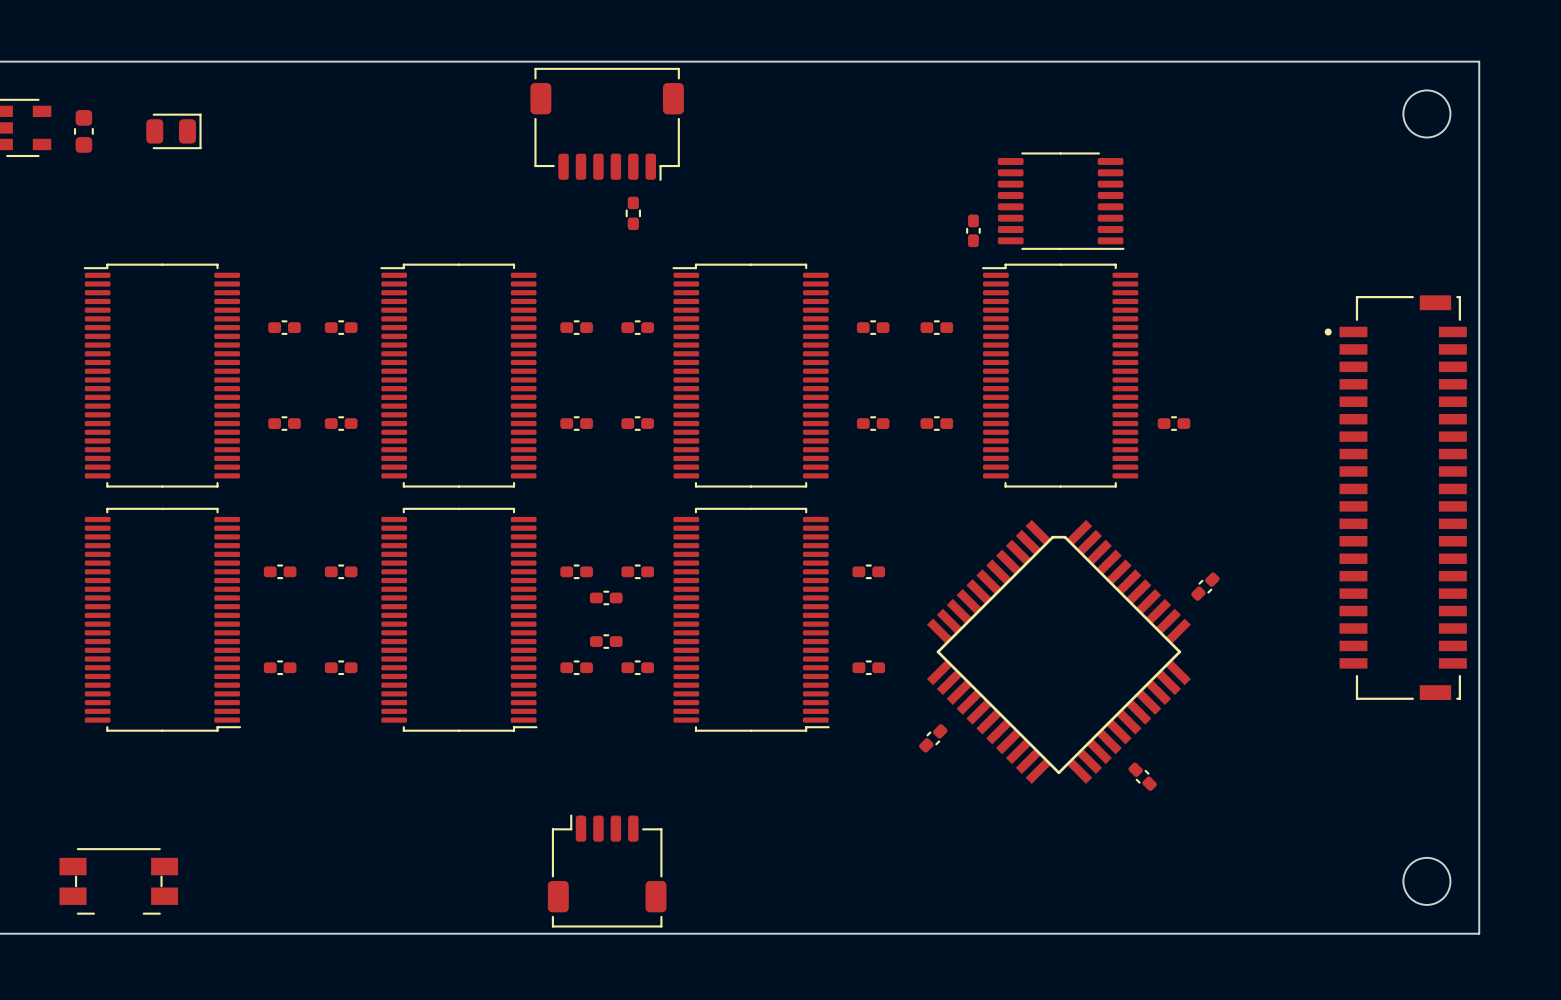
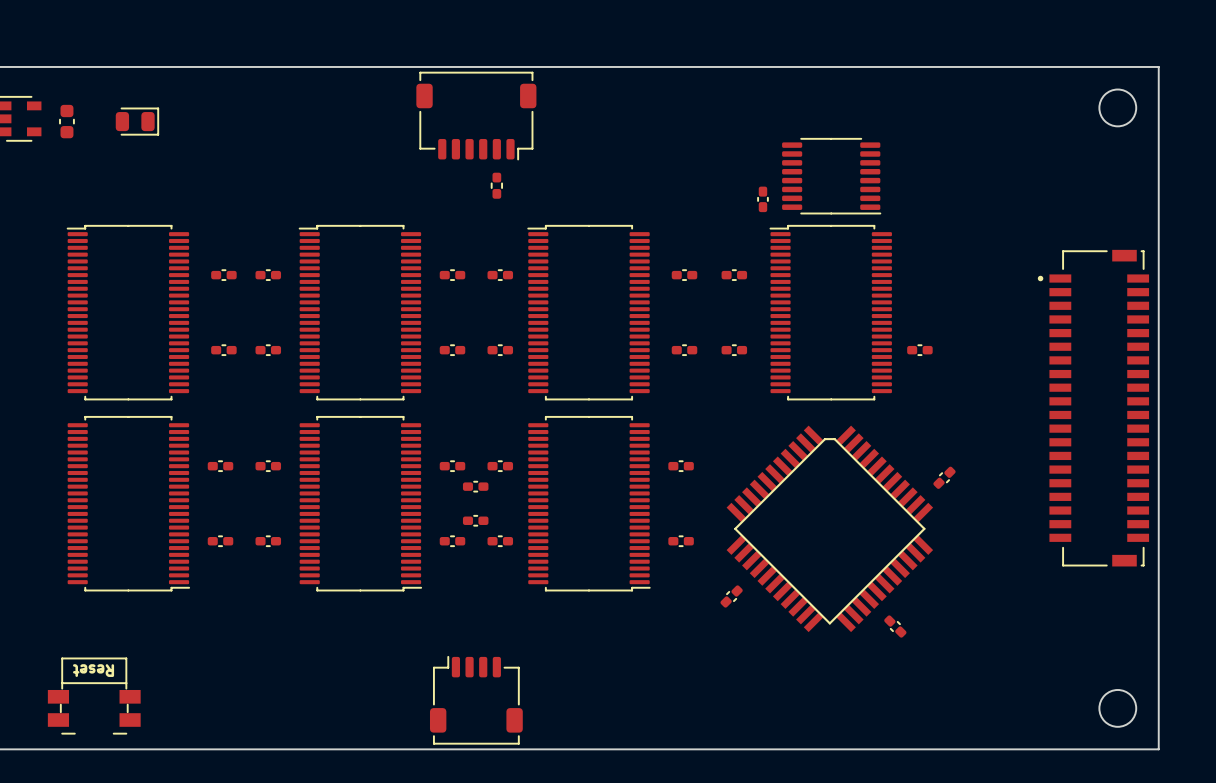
text: none -> Reset (93, 670)
line: none -> (62, 688) (62, 658) (126, 658) (126, 688)

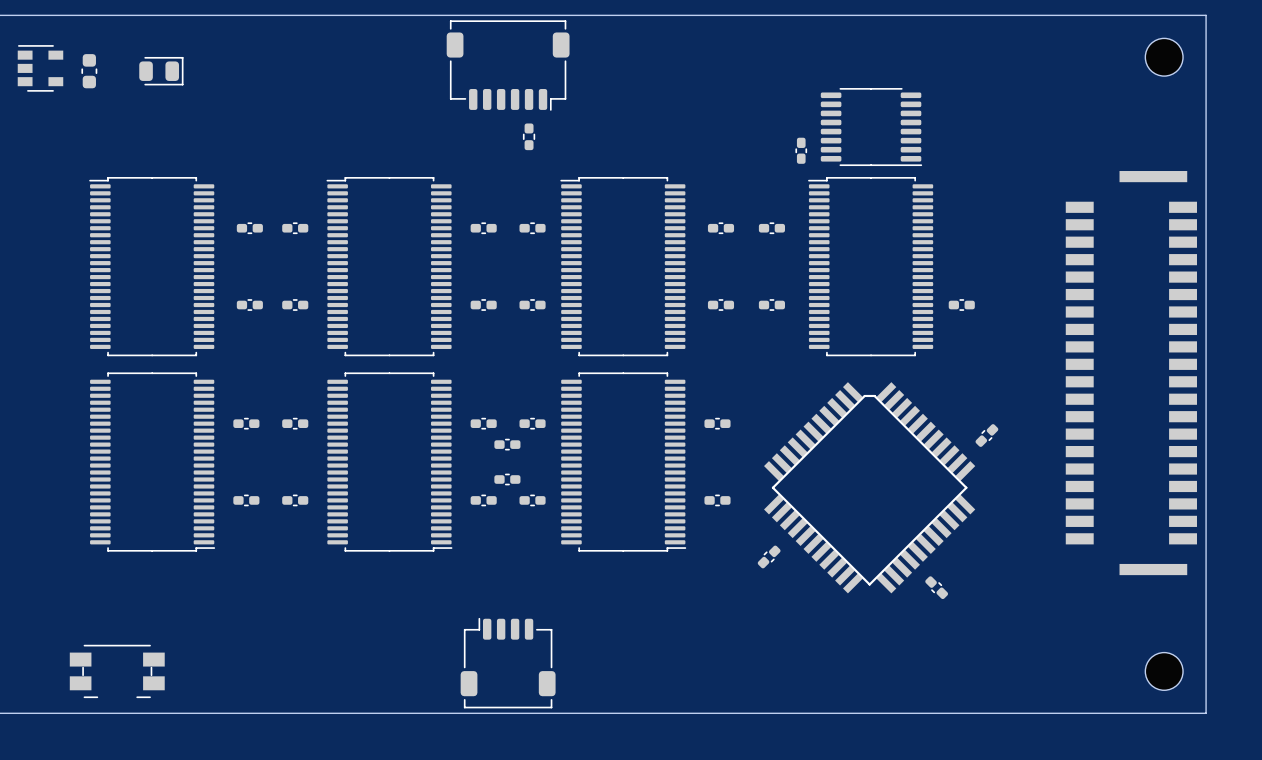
part footprint: [1037, 249, 1150, 567] -> [1065, 171, 1197, 576]
text: Reset (93, 670) -> none
line: (62, 688) (62, 658) (126, 658) (126, 688) -> none

